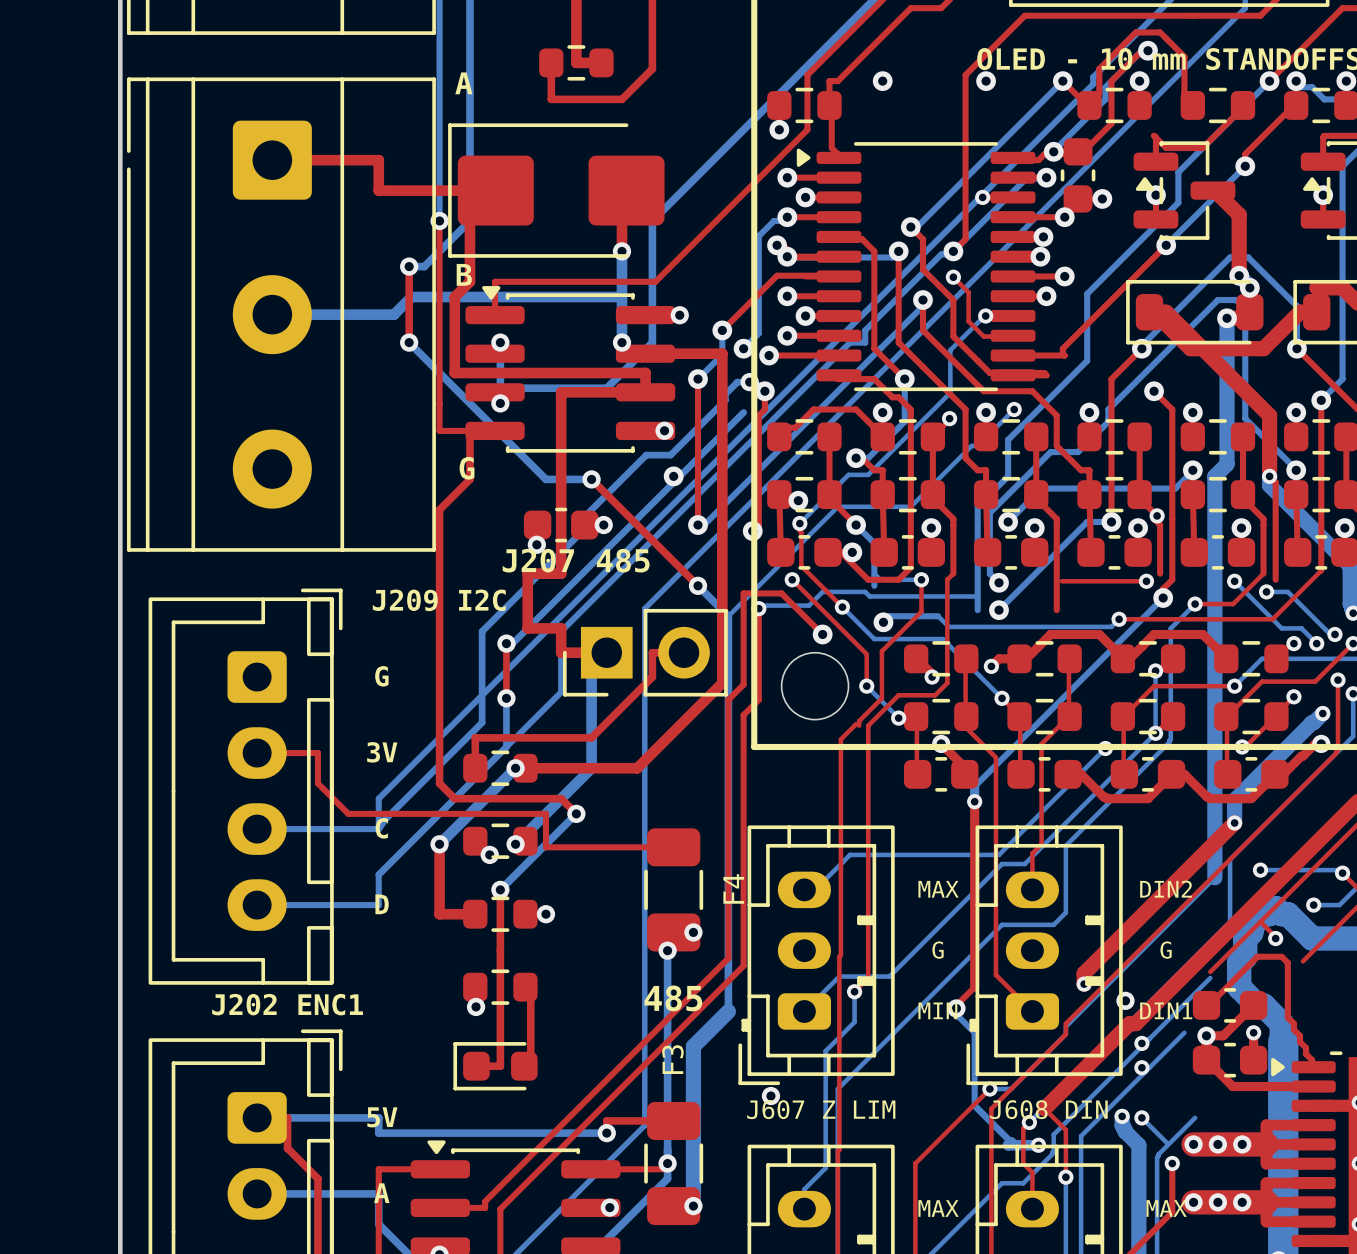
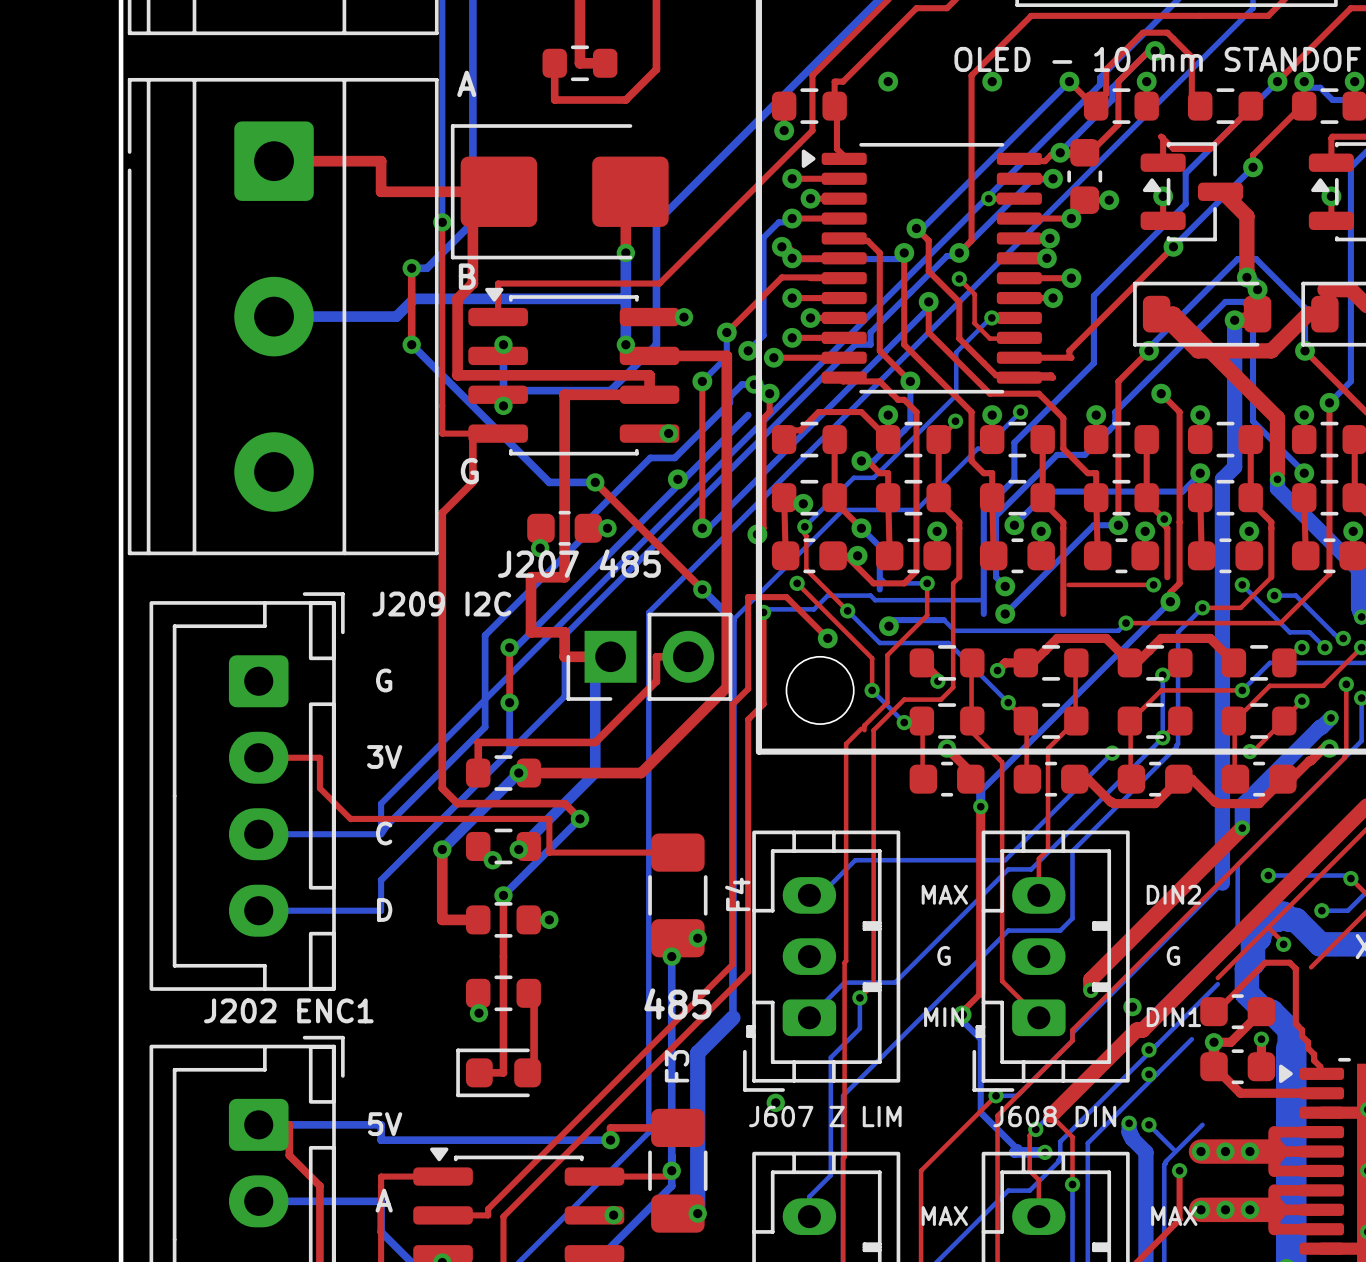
top track: (1269, 476) (1275, 482) (1275, 579) -> none

